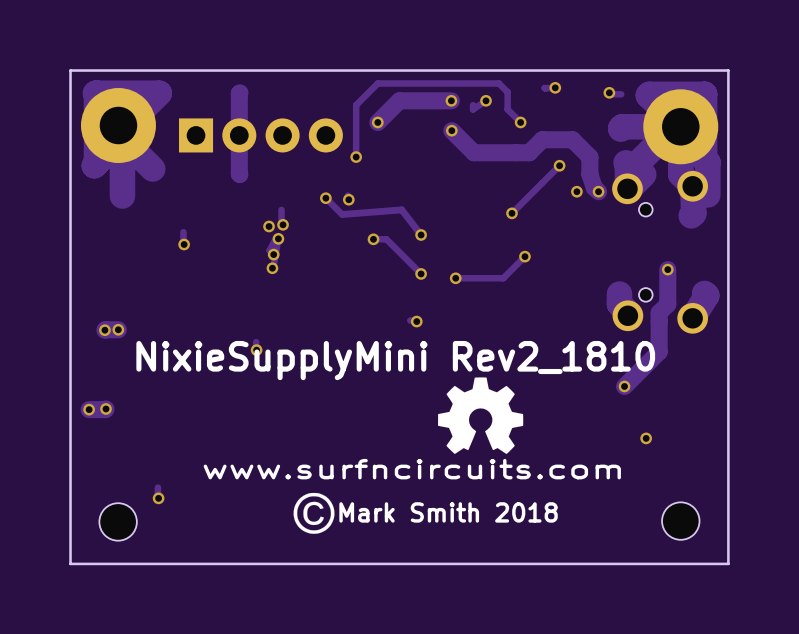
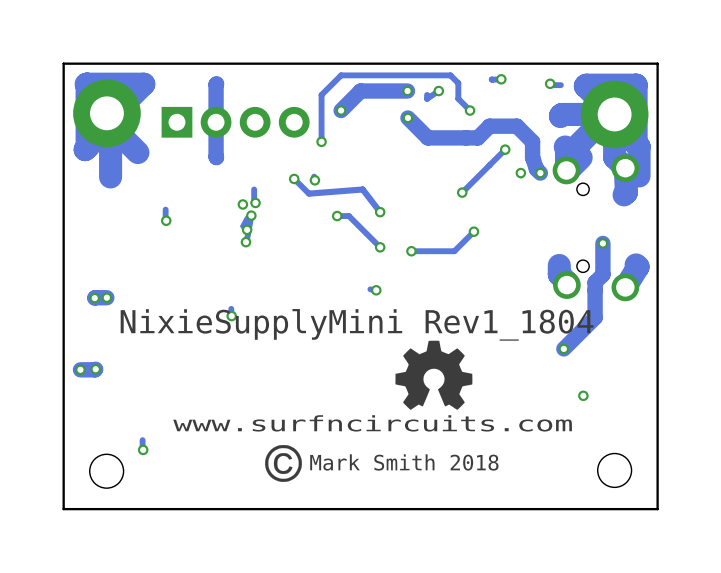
text: NixieSupplyMini Rev2_1810 (395, 360) -> NixieSupplyMini Rev1_1804 (357, 324)

